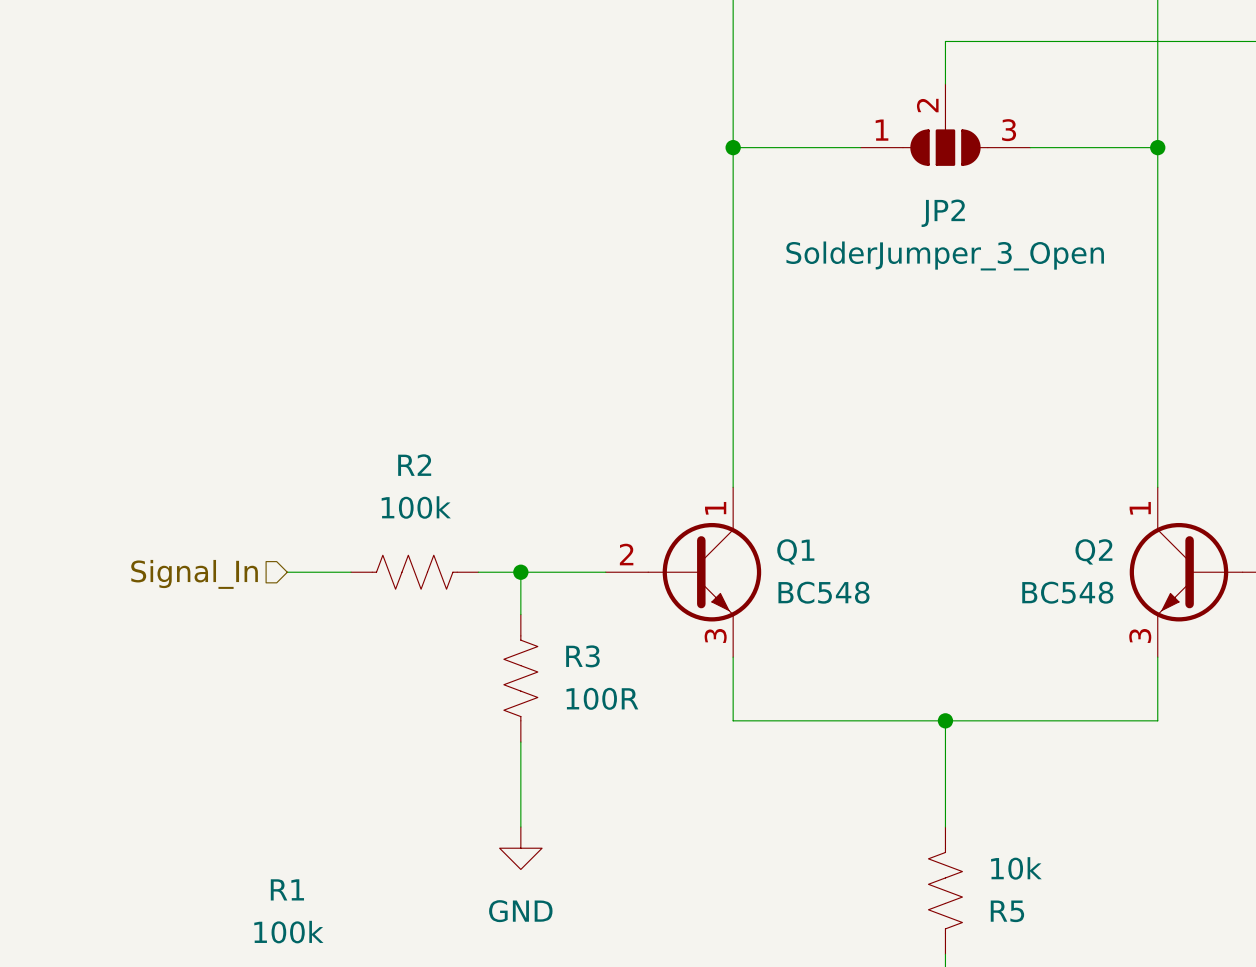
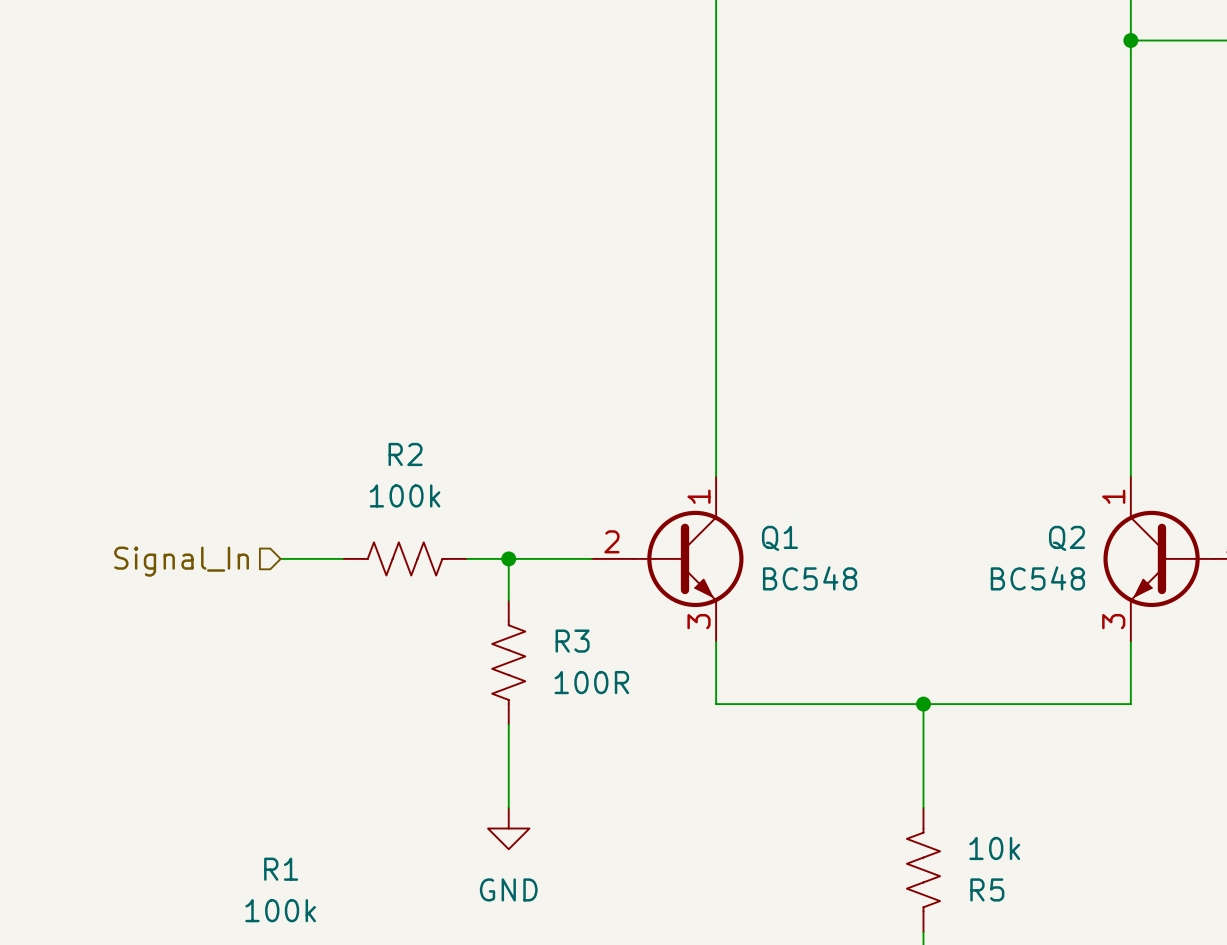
wire: (1157, 41) (945, 41) (945, 83) -> none
junction: none -> (1130, 40)
JP2: SolderJumper_3_Open (945, 124) -> none
wire: (733, 147) (860, 147) -> none
junction: (733, 147) -> none
wire: (1030, 147) (1157, 147) -> none
junction: (1157, 147) -> none

